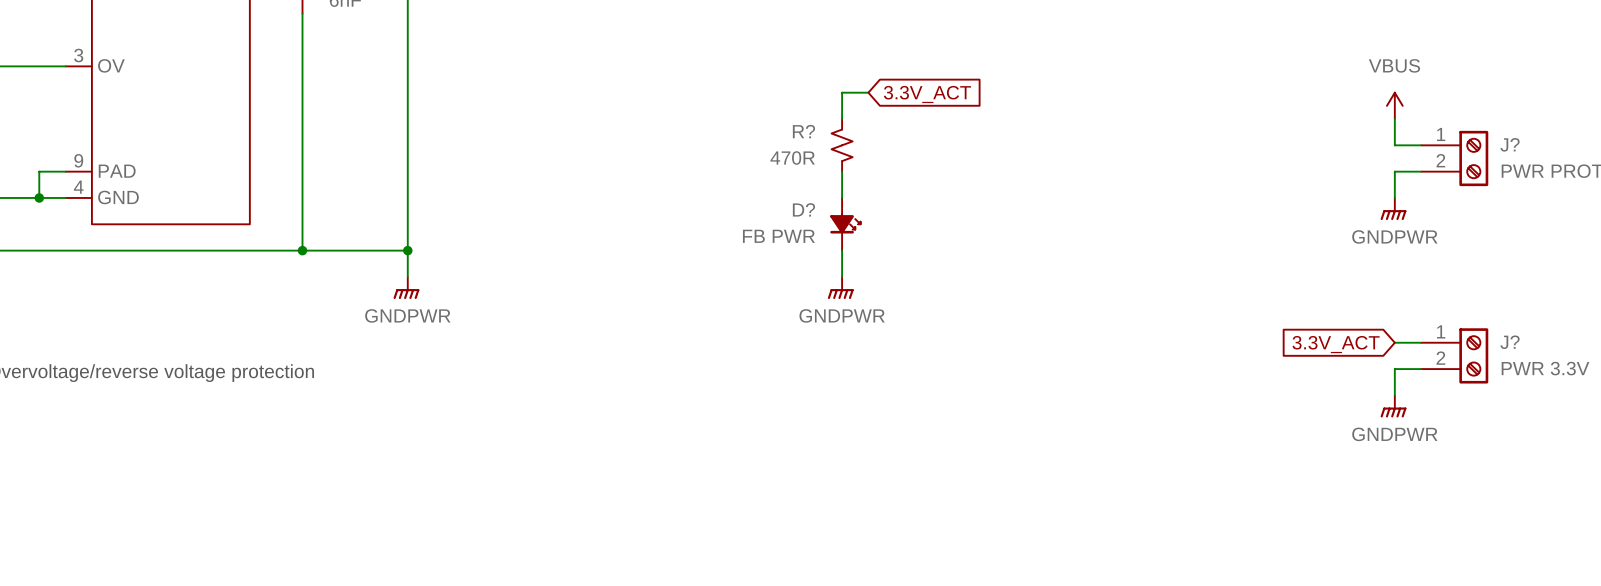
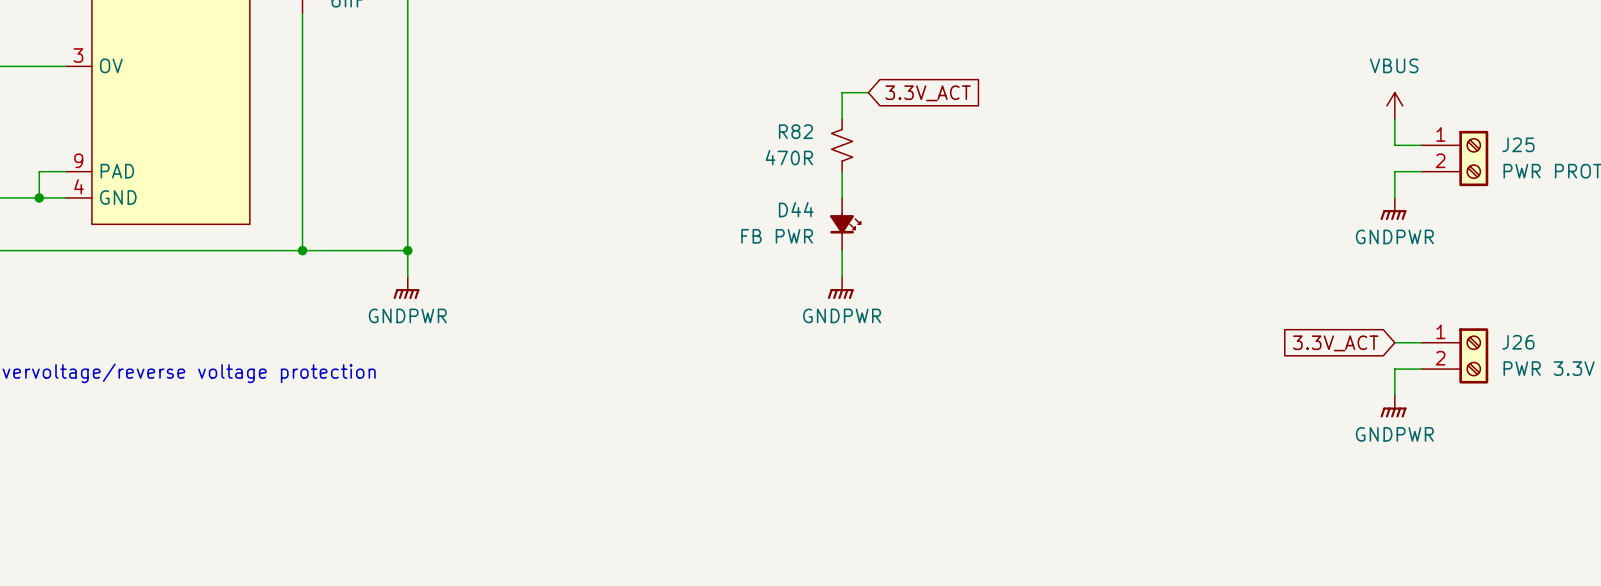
R? name: R? (803, 131) -> R82 (795, 131)
J? name: J? (1510, 144) -> J25 (1518, 144)
D? name: D? (803, 209) -> D44 (796, 209)
J? name: J? (1510, 342) -> J26 (1518, 342)

